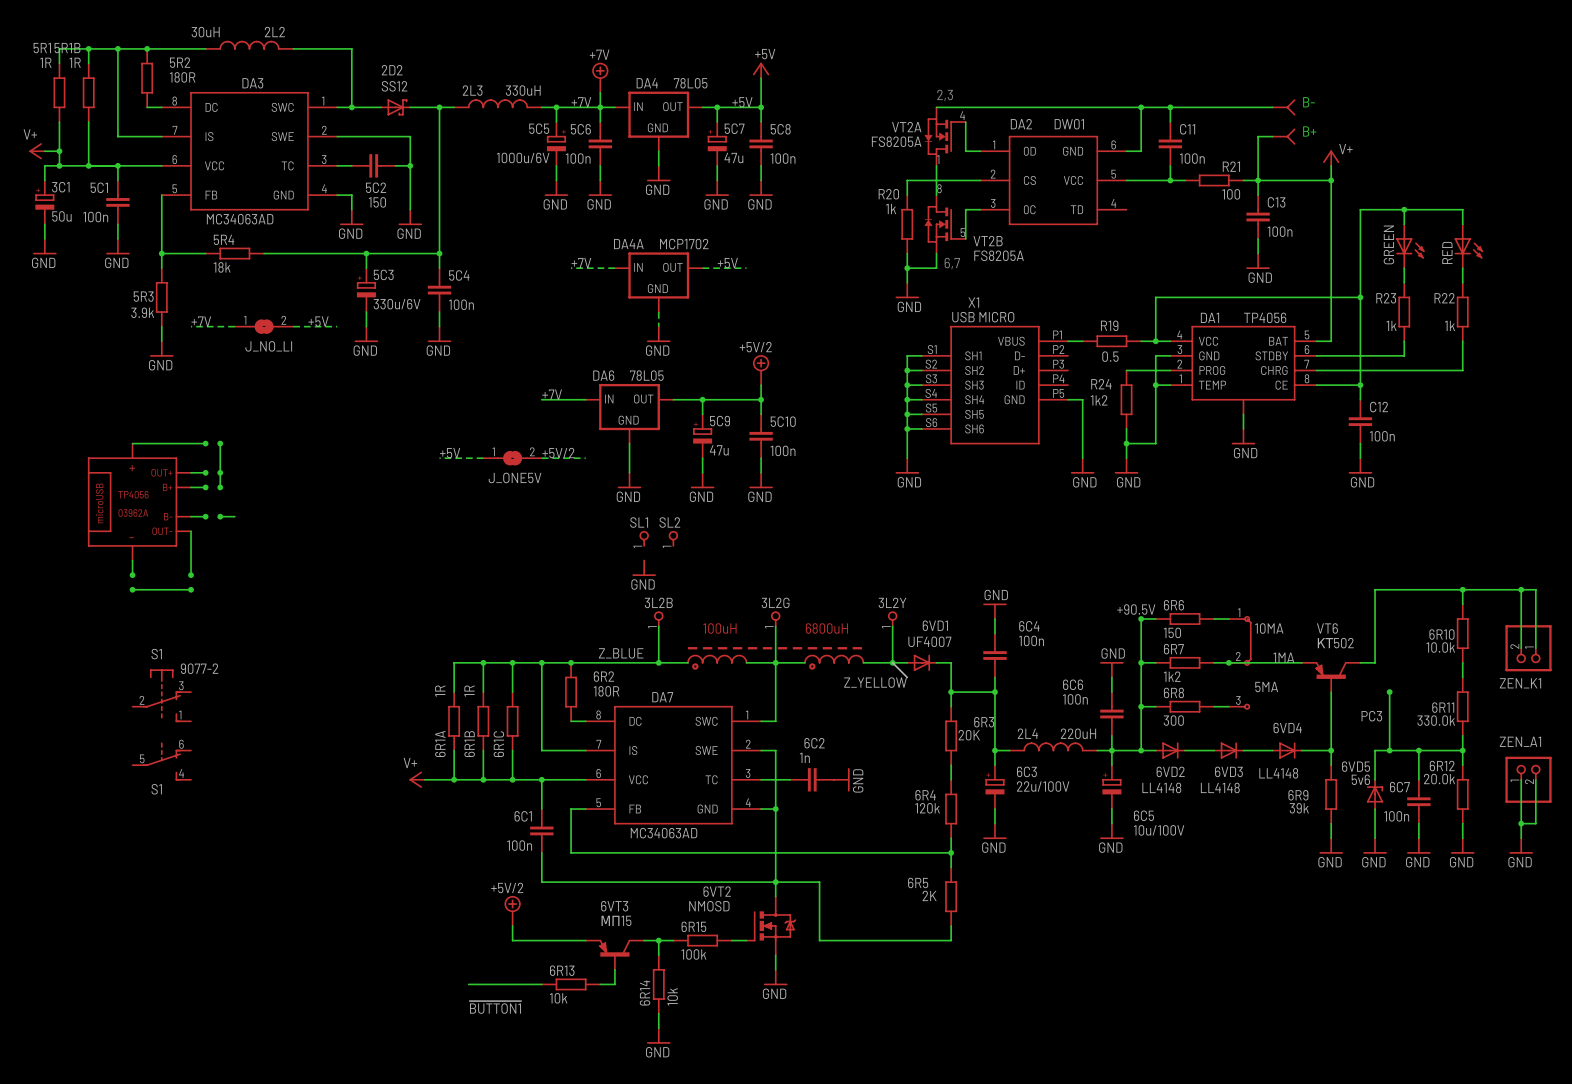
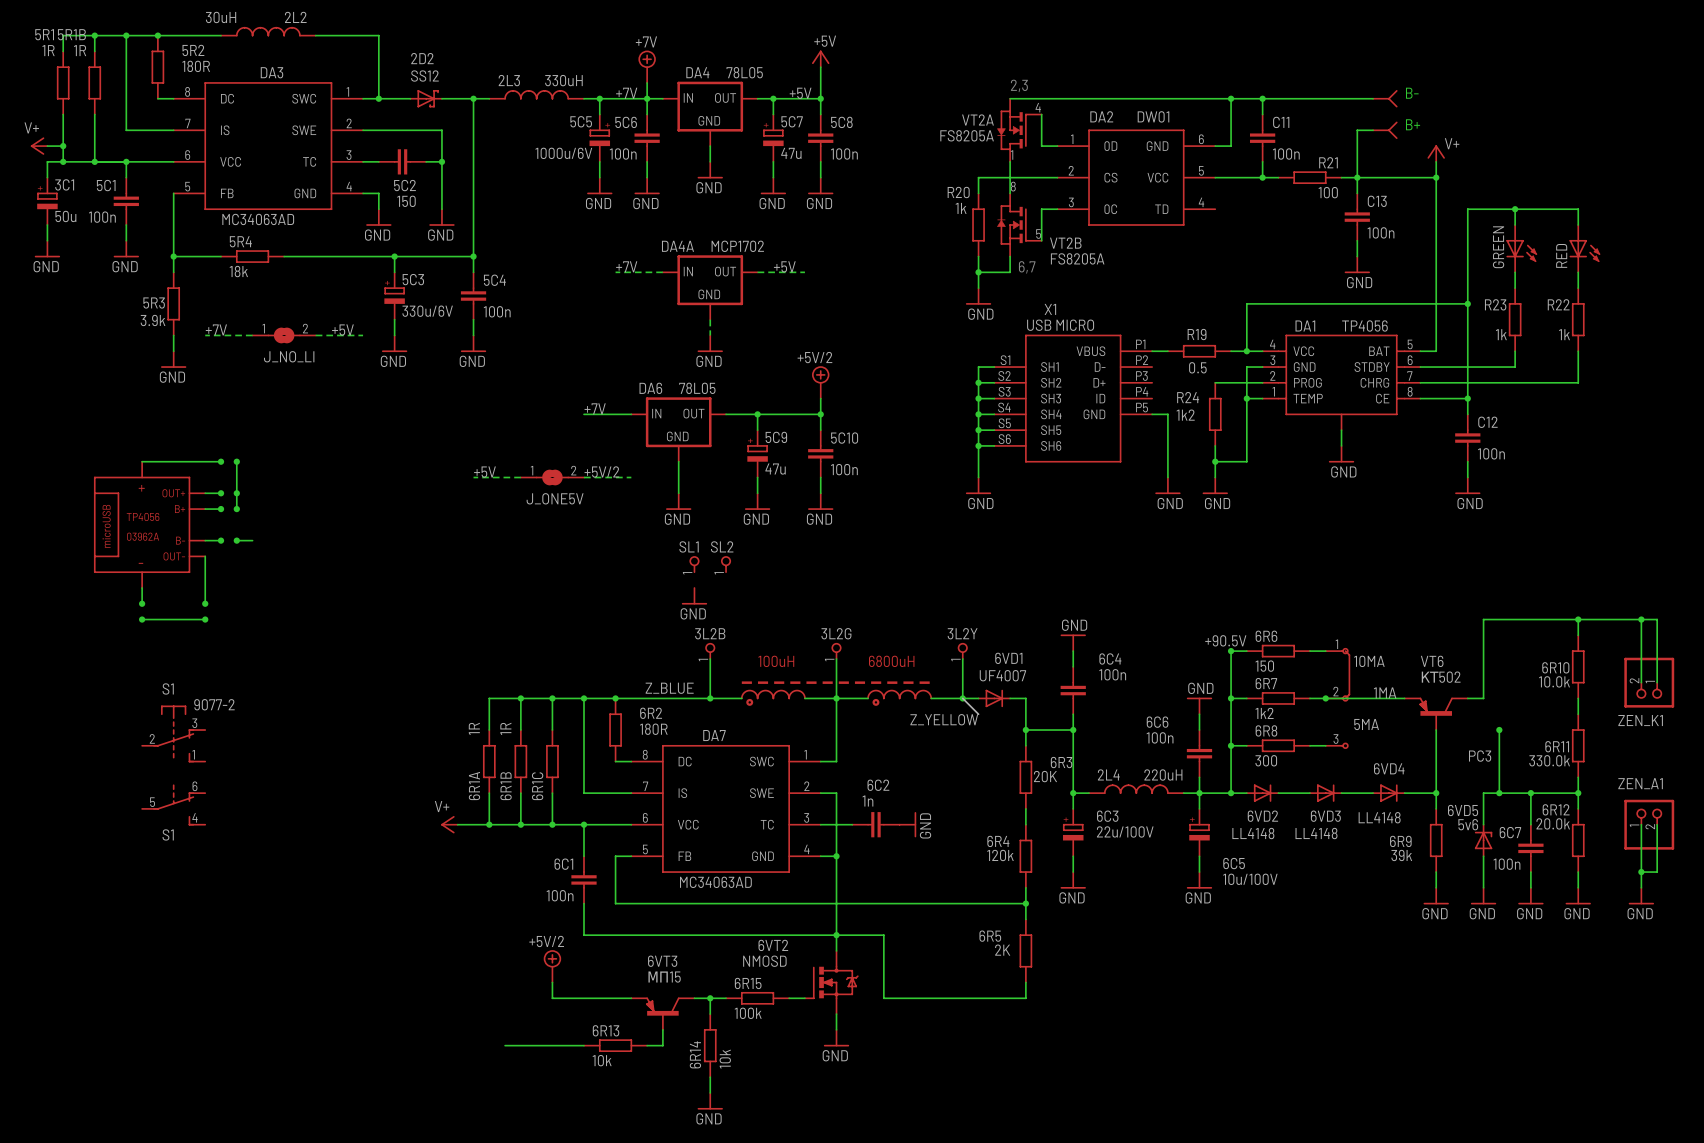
label: ~{BUTTON1} (495, 1007) -> none

